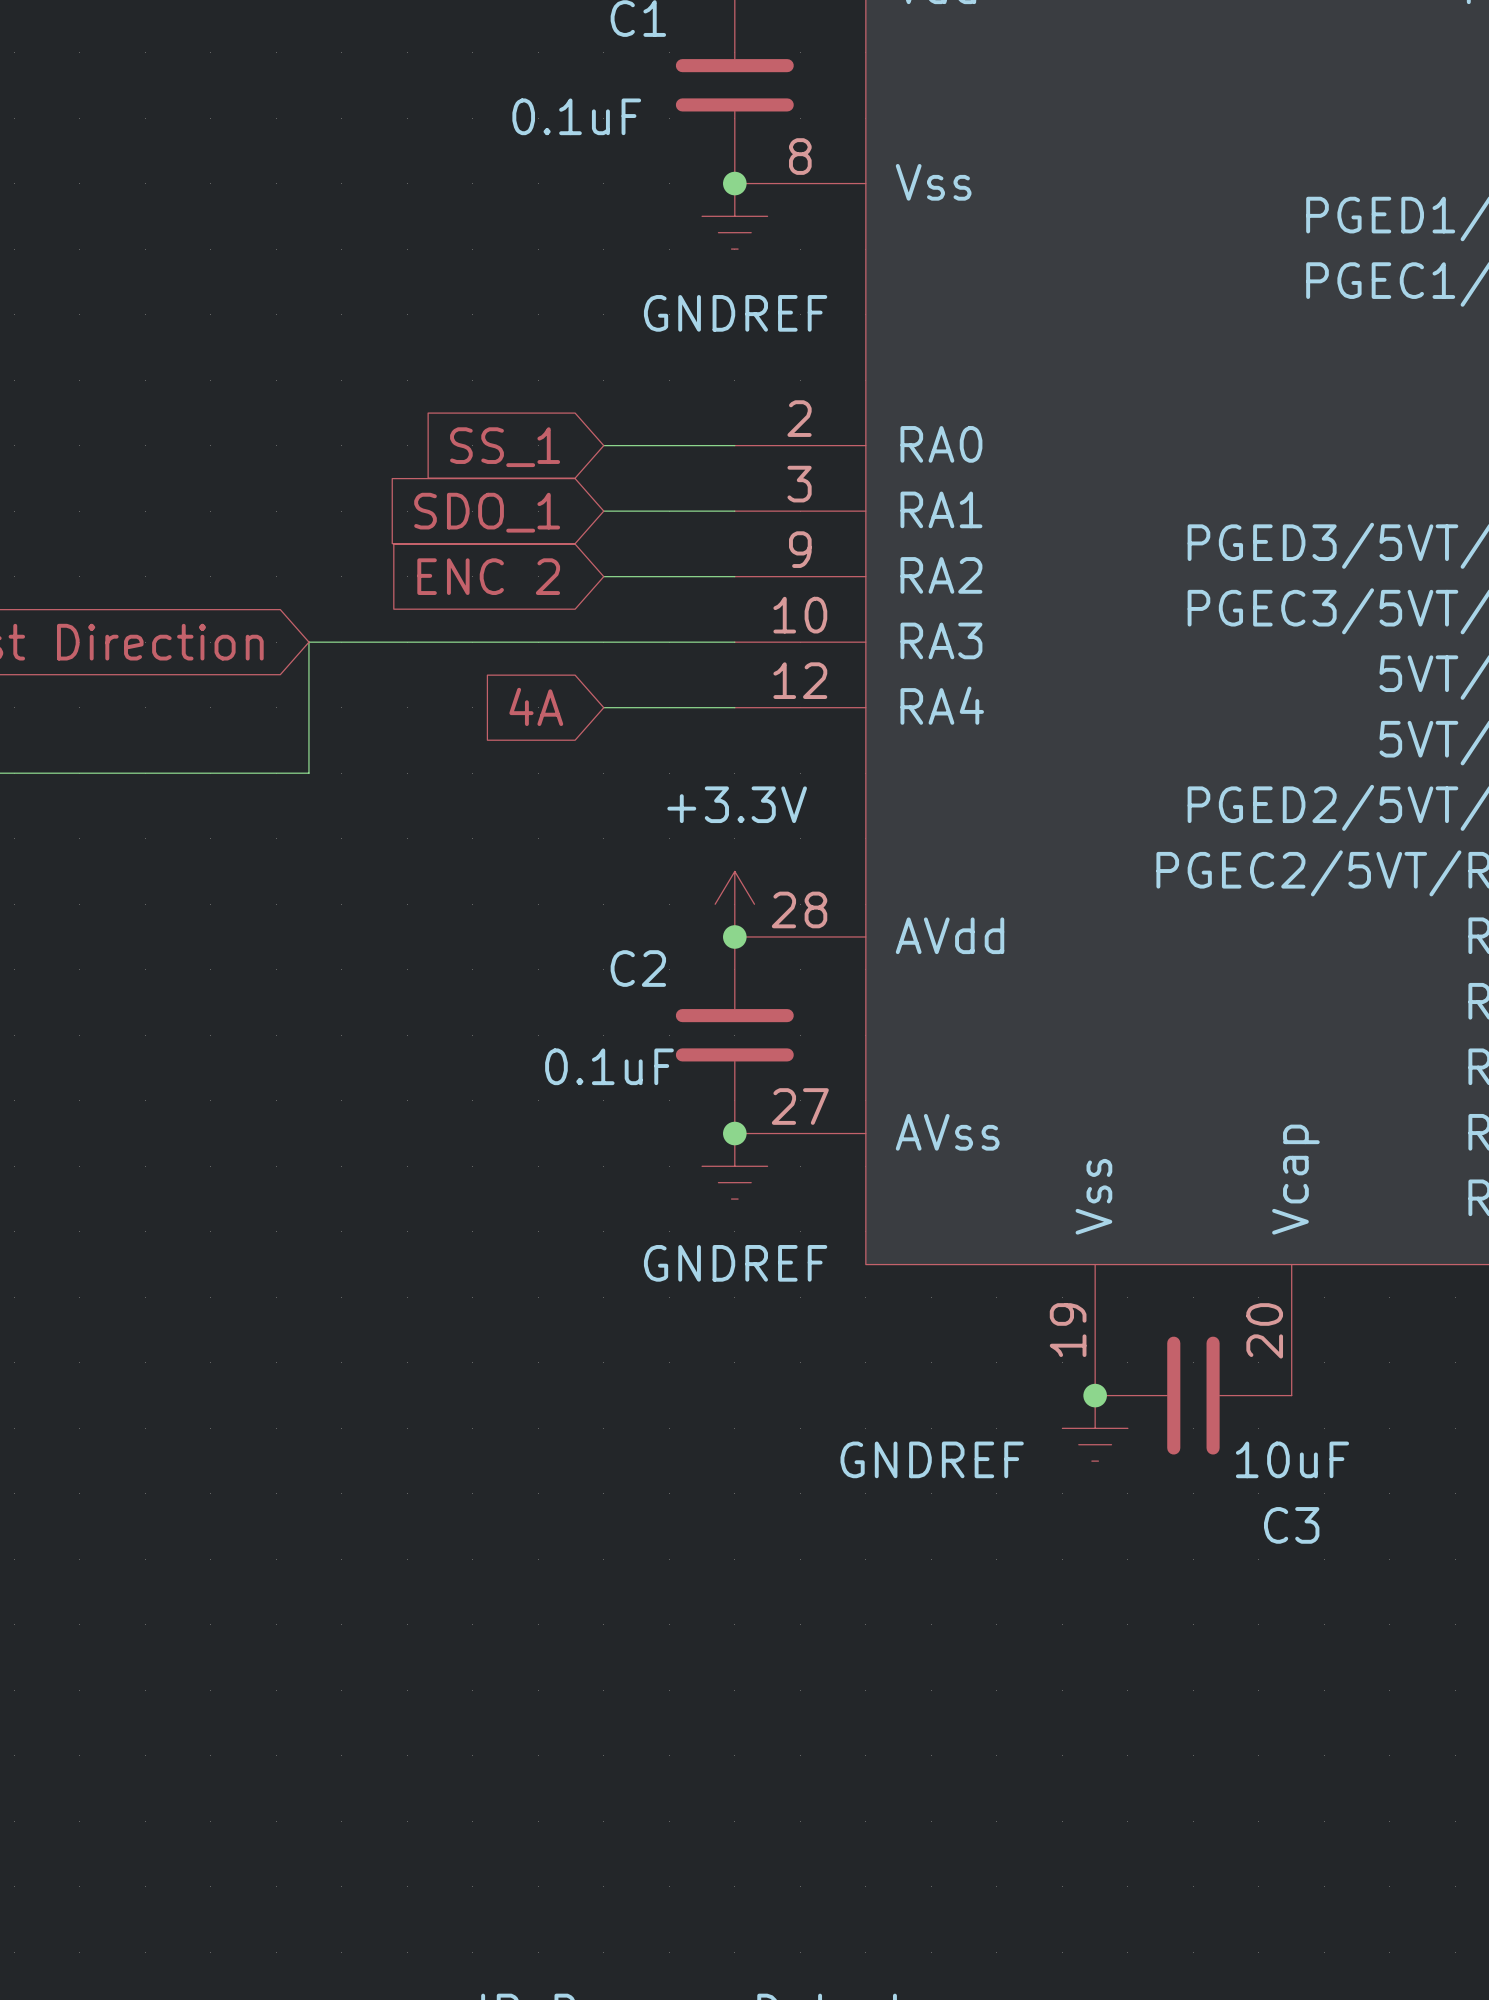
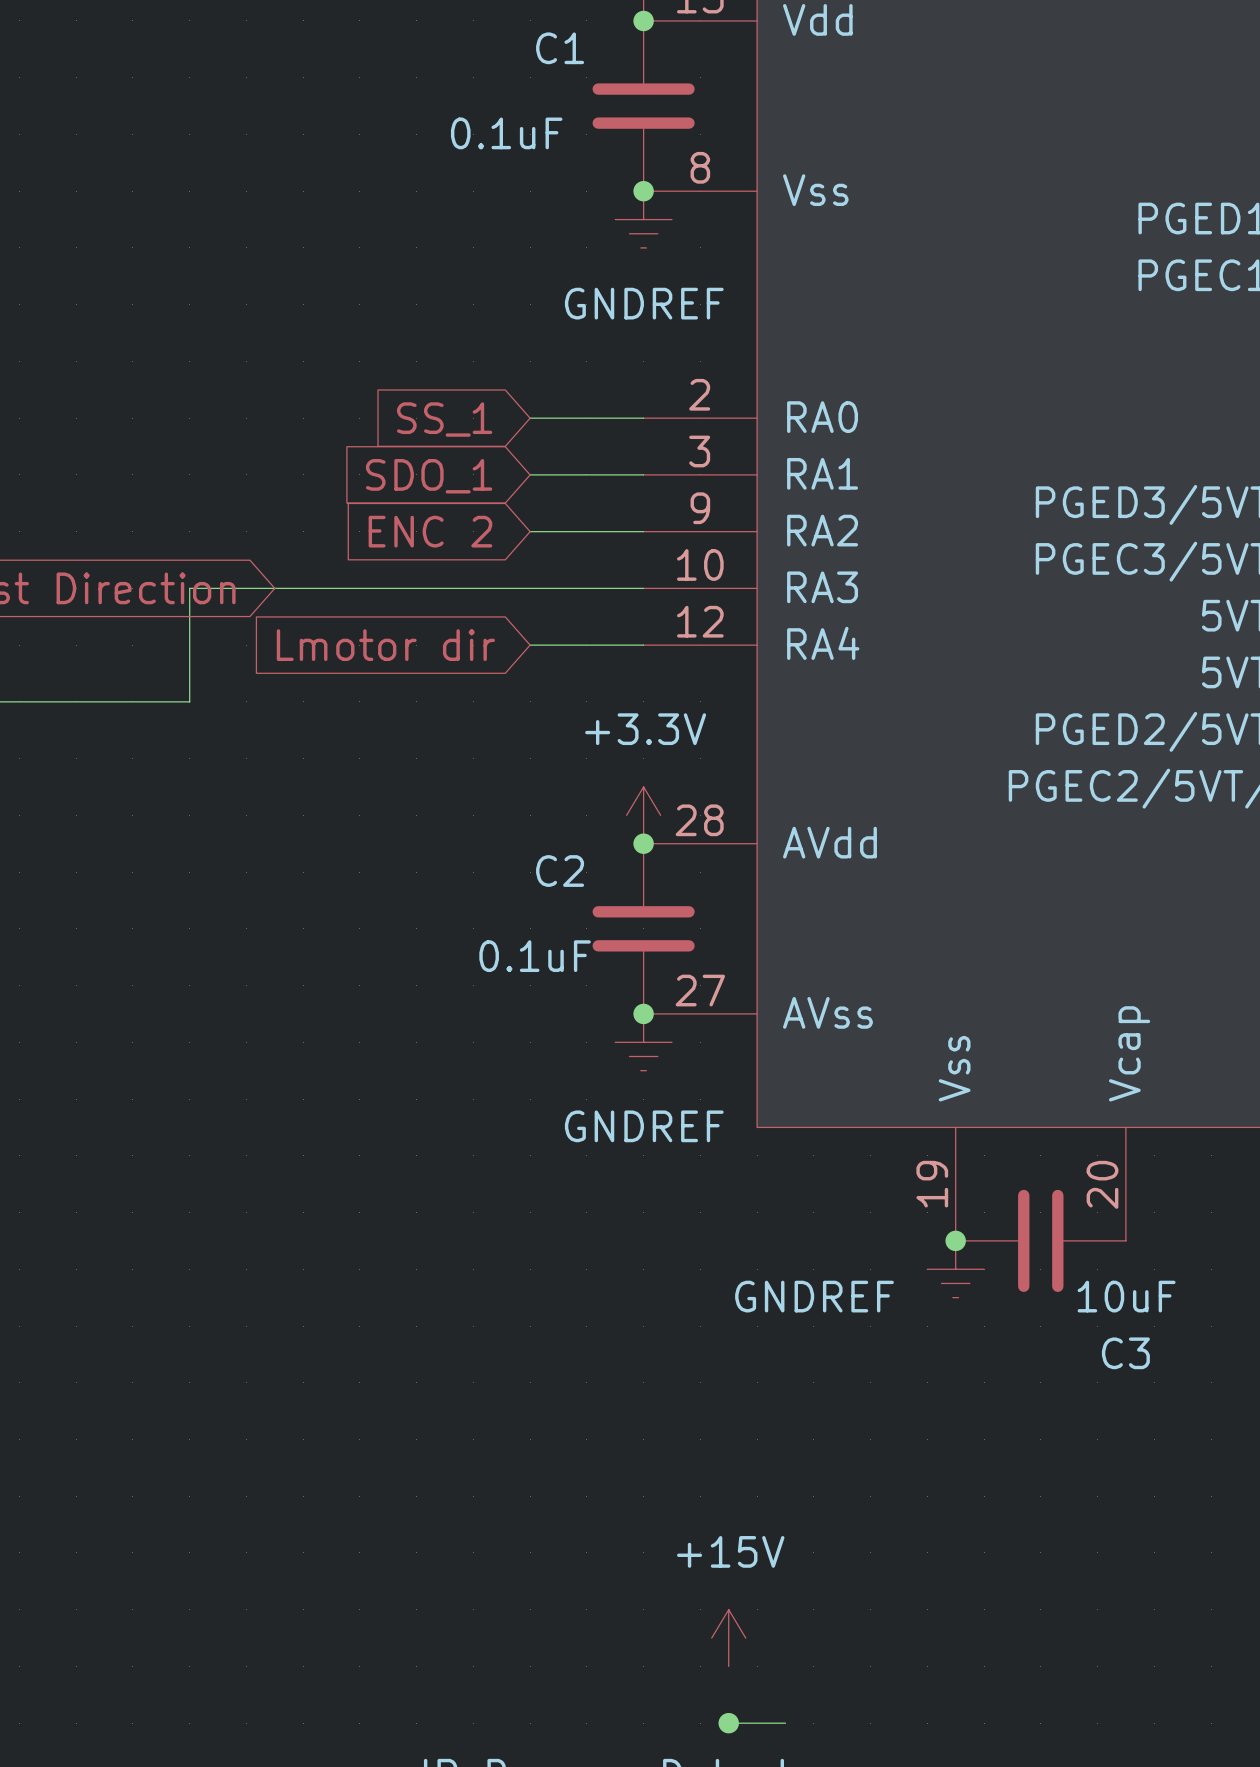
wire: (308, 642) (308, 773) (210, 773) -> (274, 588) (189, 588) (189, 701)
global label: 4A (536, 706) -> Lmotor dir (385, 645)
power symbol: none -> +15V (728, 1638)
wire: none -> (728, 1723) (785, 1723)
junction: none -> (728, 1723)

